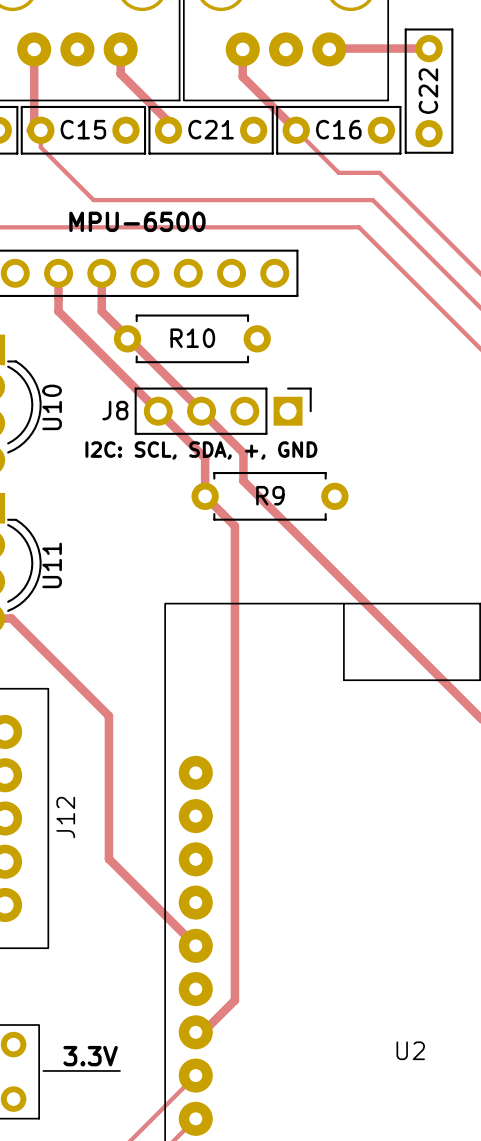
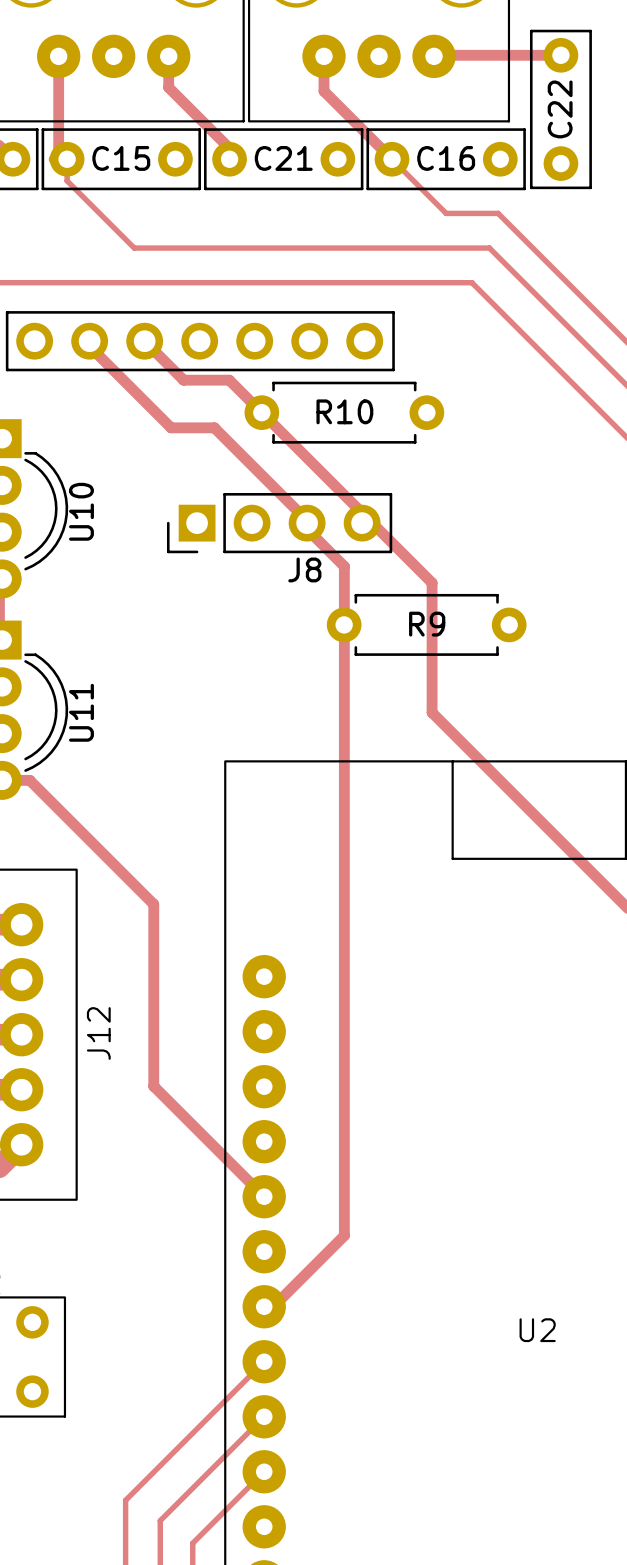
text: MPU-6500 (137, 221) -> none
track: (101, 273) (101, 311) (243, 453) (243, 481) (327, 565) -> (144, 341) (183, 380) (229, 380) (432, 582) (432, 712)
track: (58, 277) (58, 311) (205, 458) (205, 496) (234, 526) (234, 1000) -> (89, 346) (171, 427) (214, 427) (307, 520) (307, 529) (344, 566) (344, 1235) (314, 1266)
R10 position: (192, 338) -> (344, 412)
J8 name position: J8 (115, 410) -> J8 (304, 569)
J8 rotation: 0° (223, 411) -> 180° (279, 523)
text: I2C: SCL, SDA, +, GND (201, 450) -> none
R9 position: (270, 496) -> (426, 624)
text: 3.3V (90, 1056) -> none
line: (43, 1070) (120, 1070) -> none

